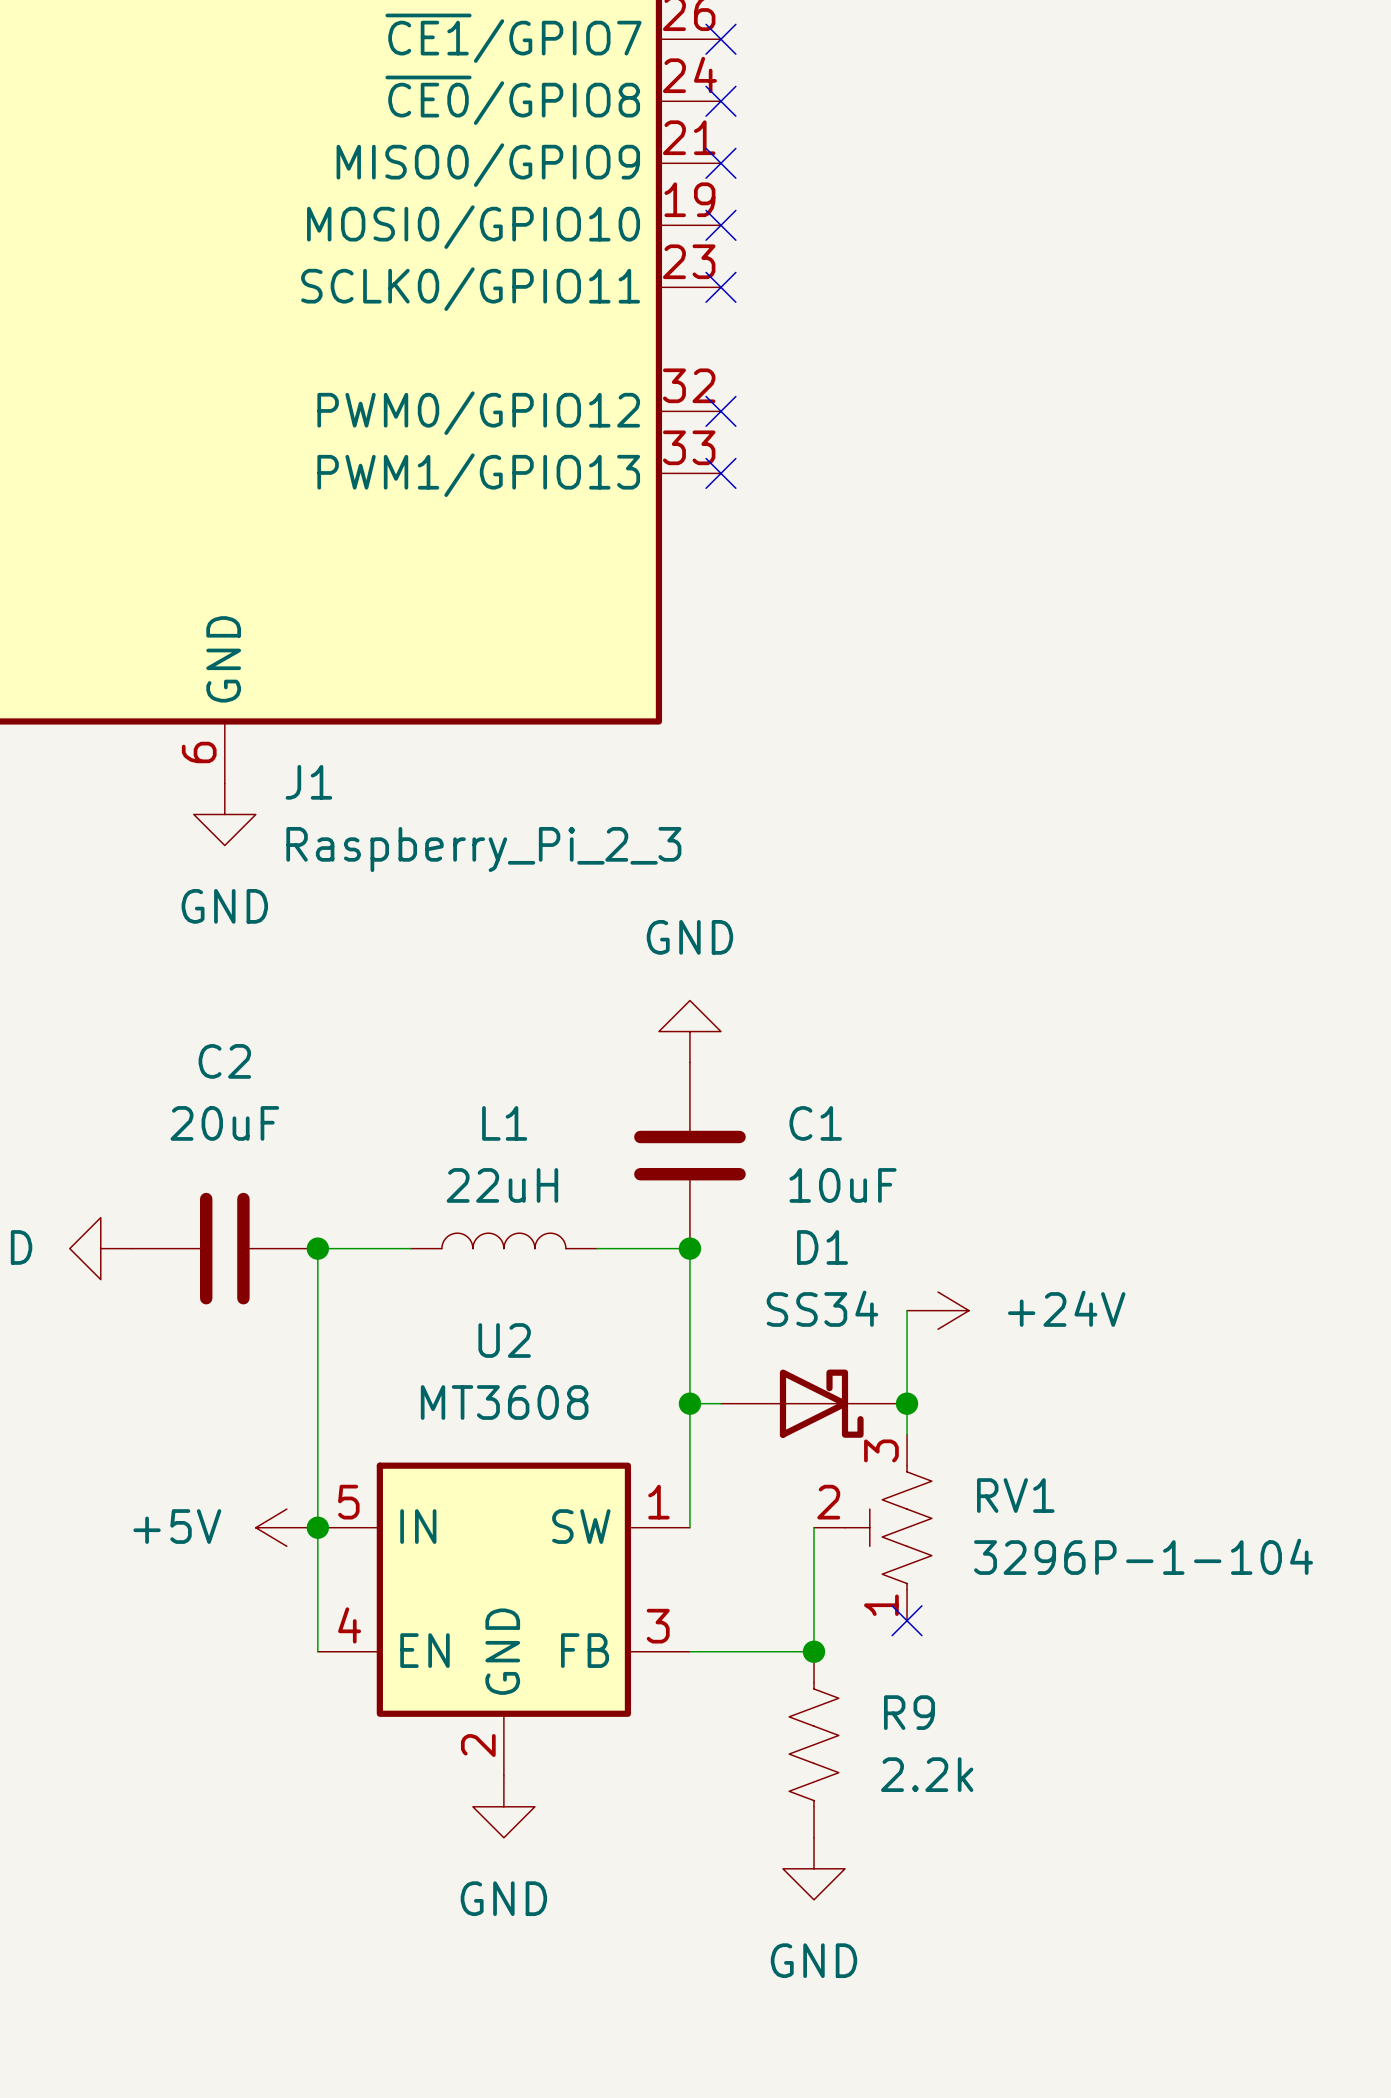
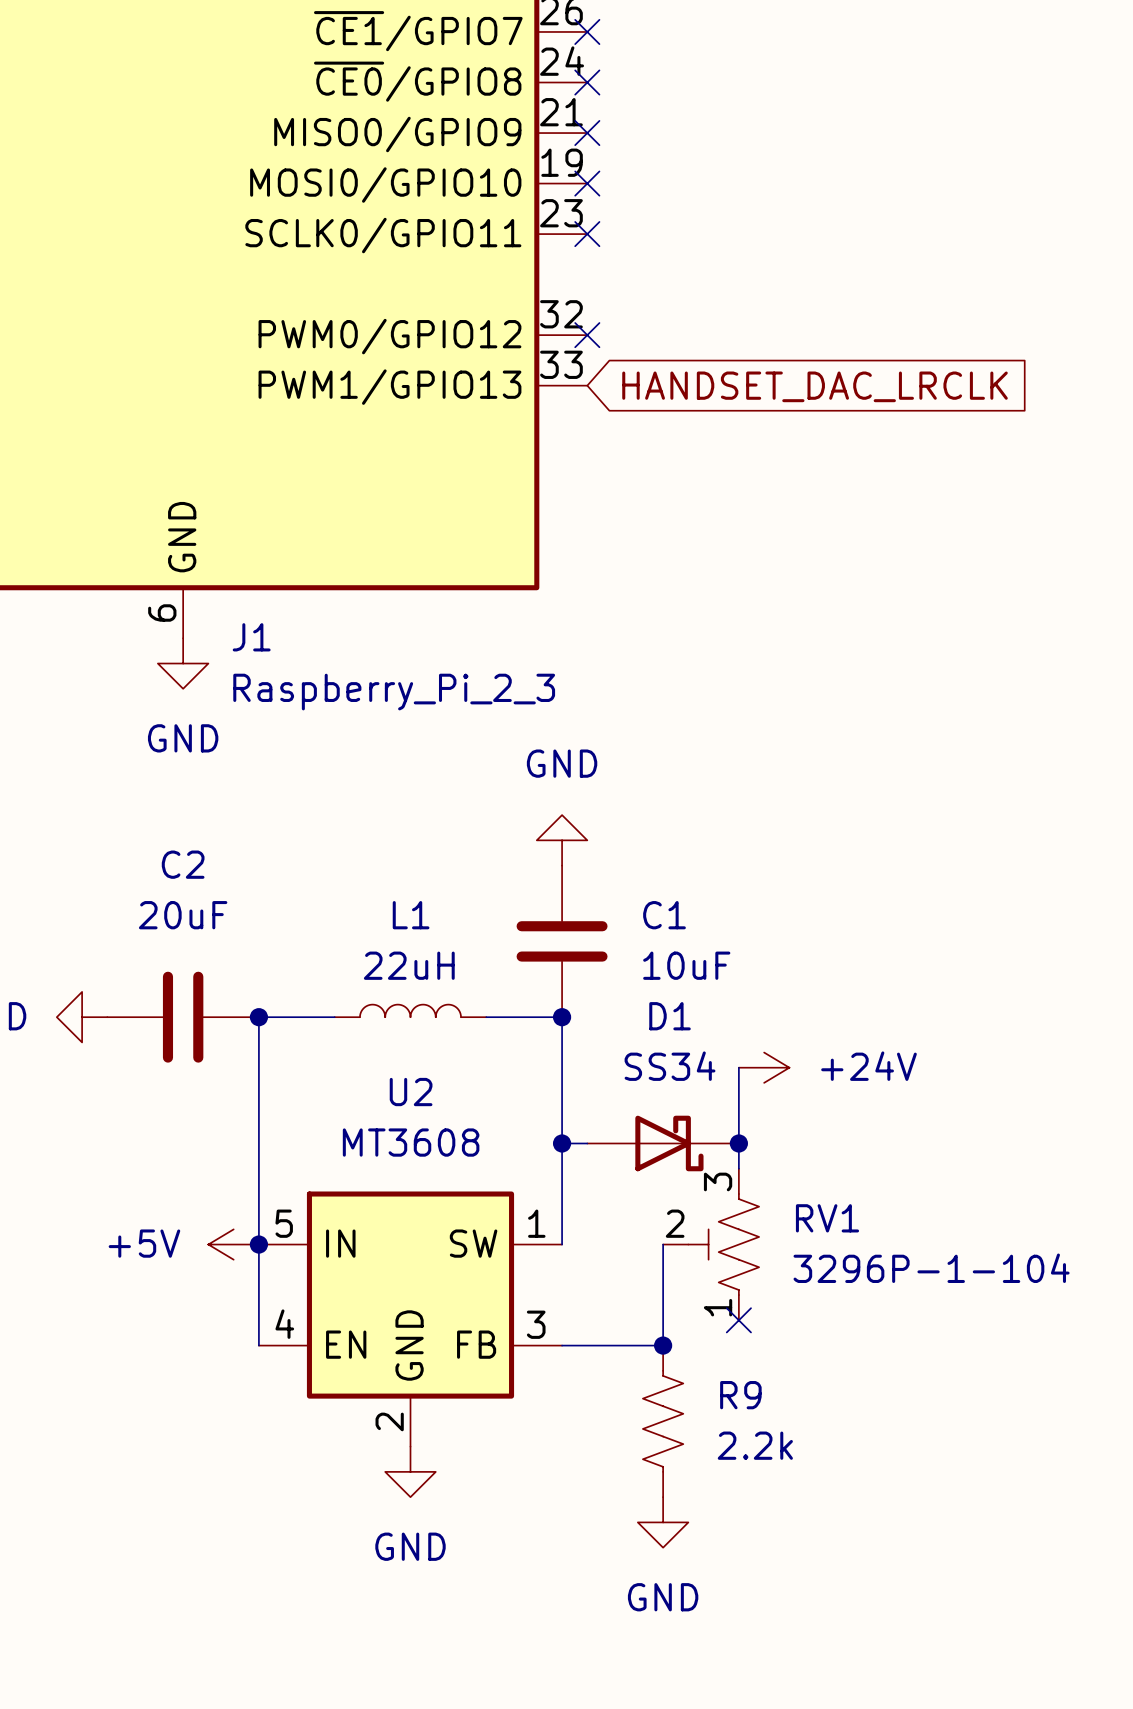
no-connect mark: (720, 473) -> none
global label: none -> HANDSET_DAC_LRCLK (815, 386)

